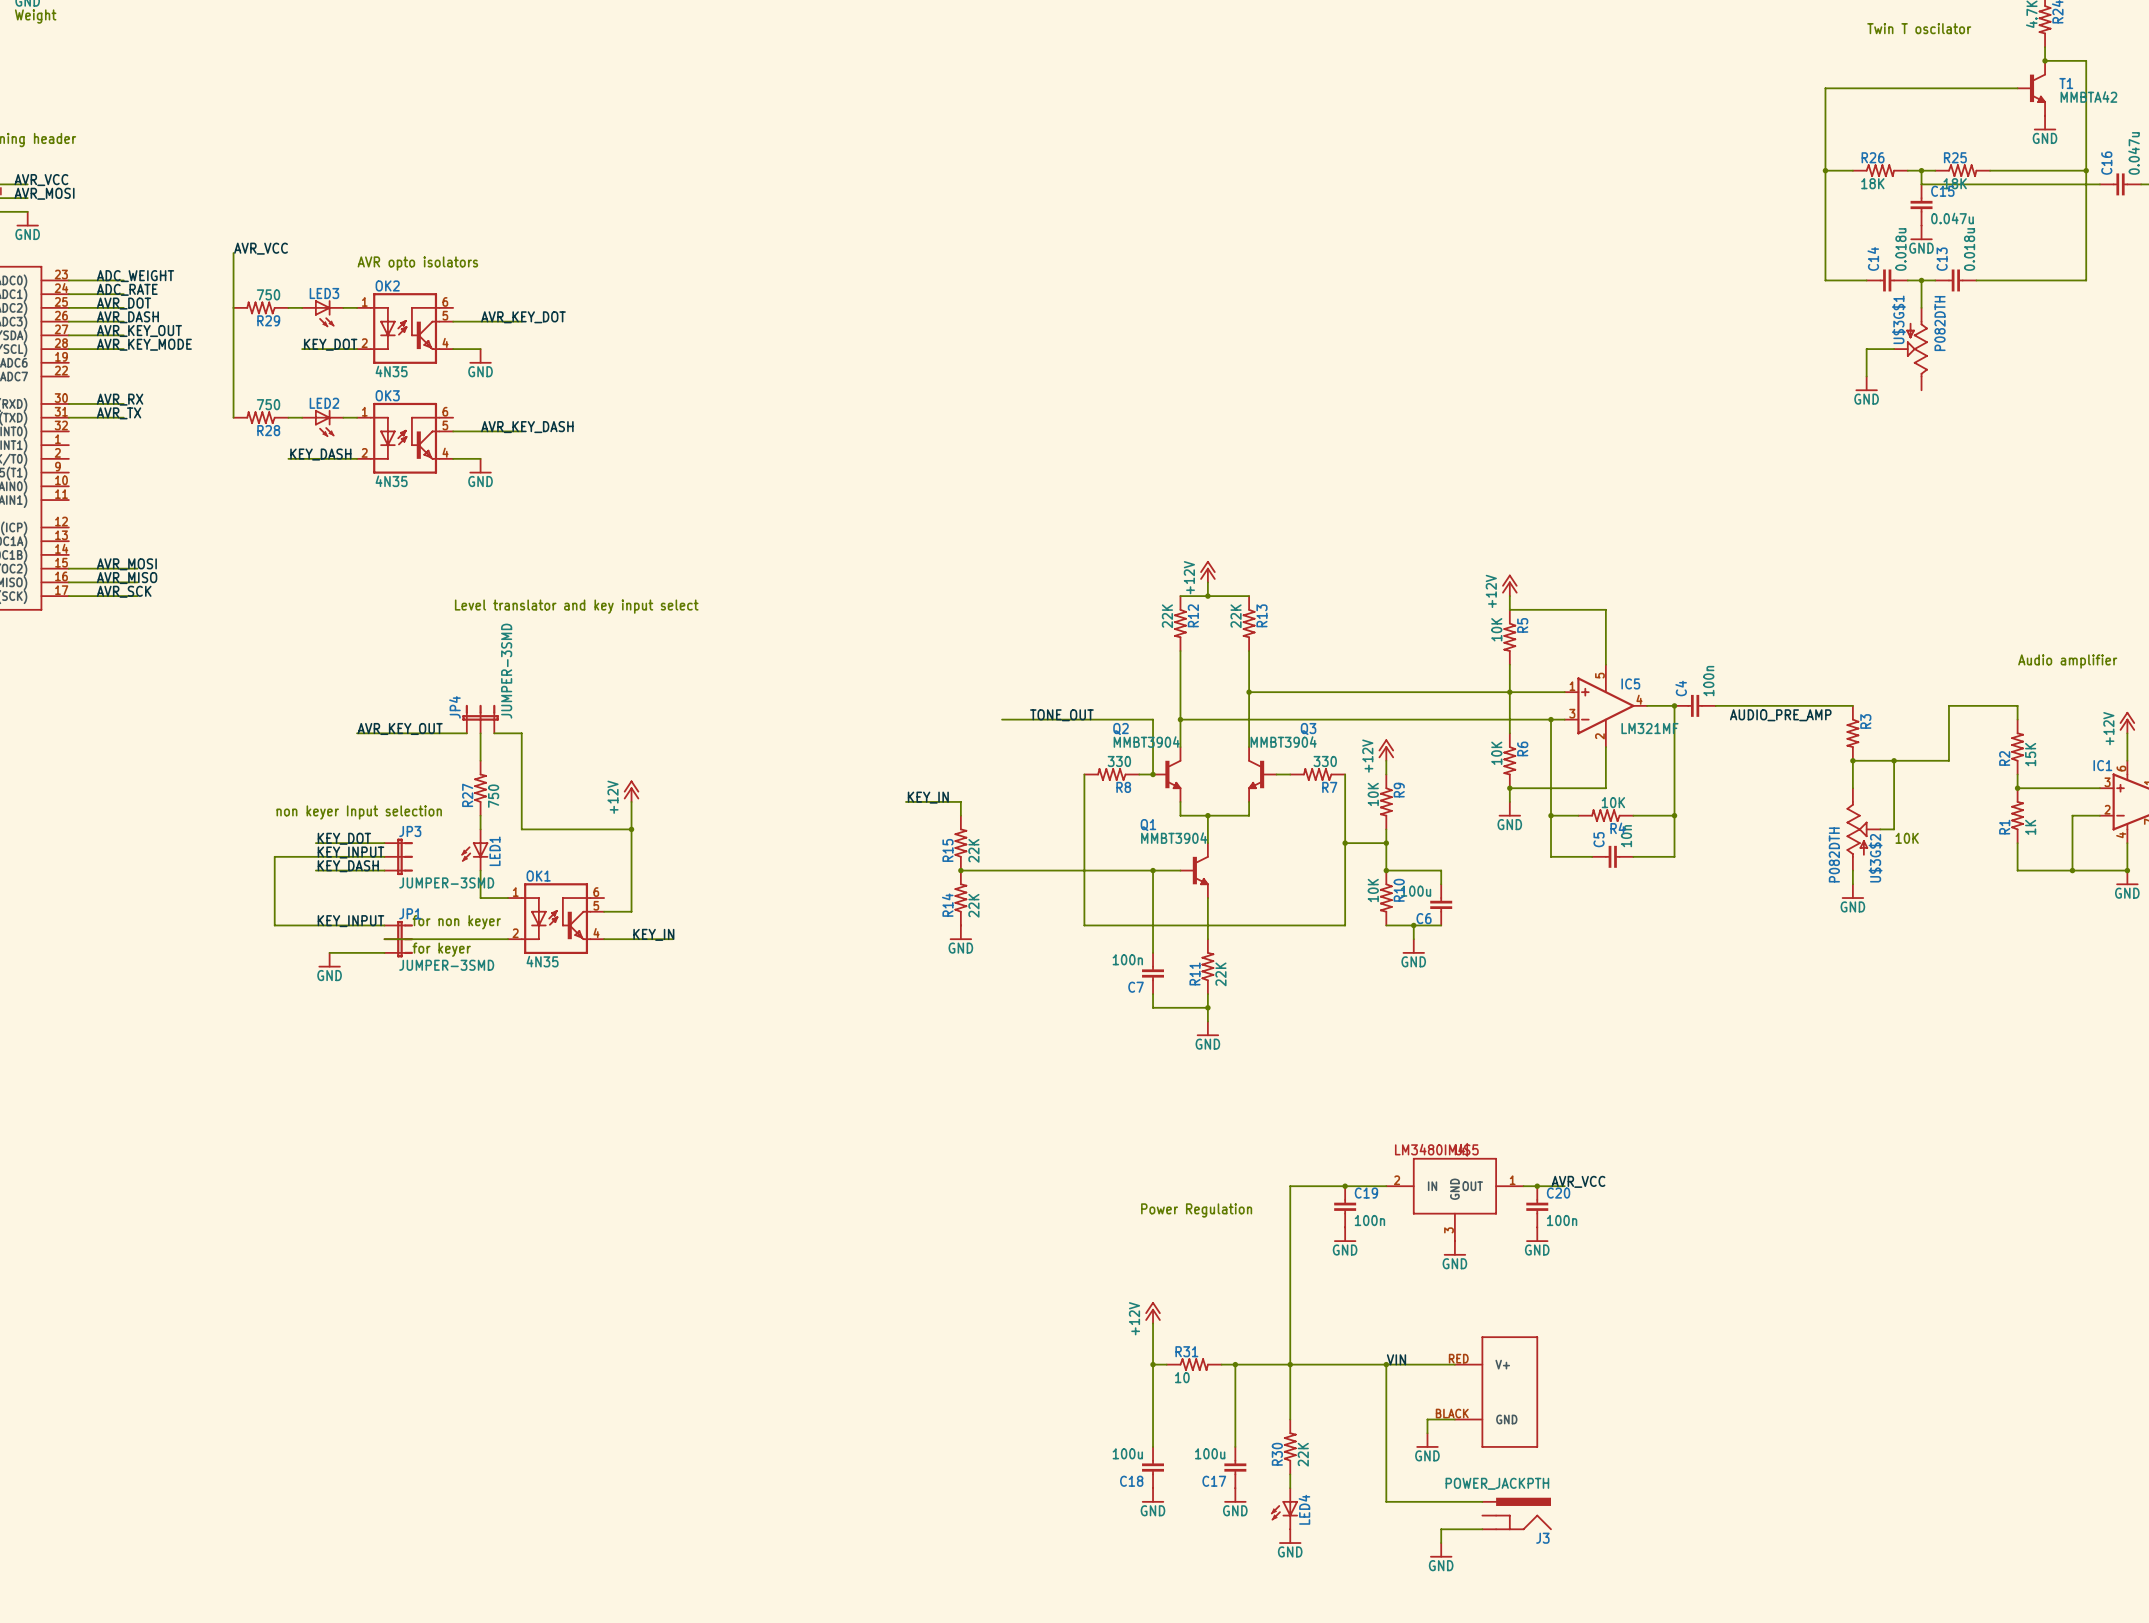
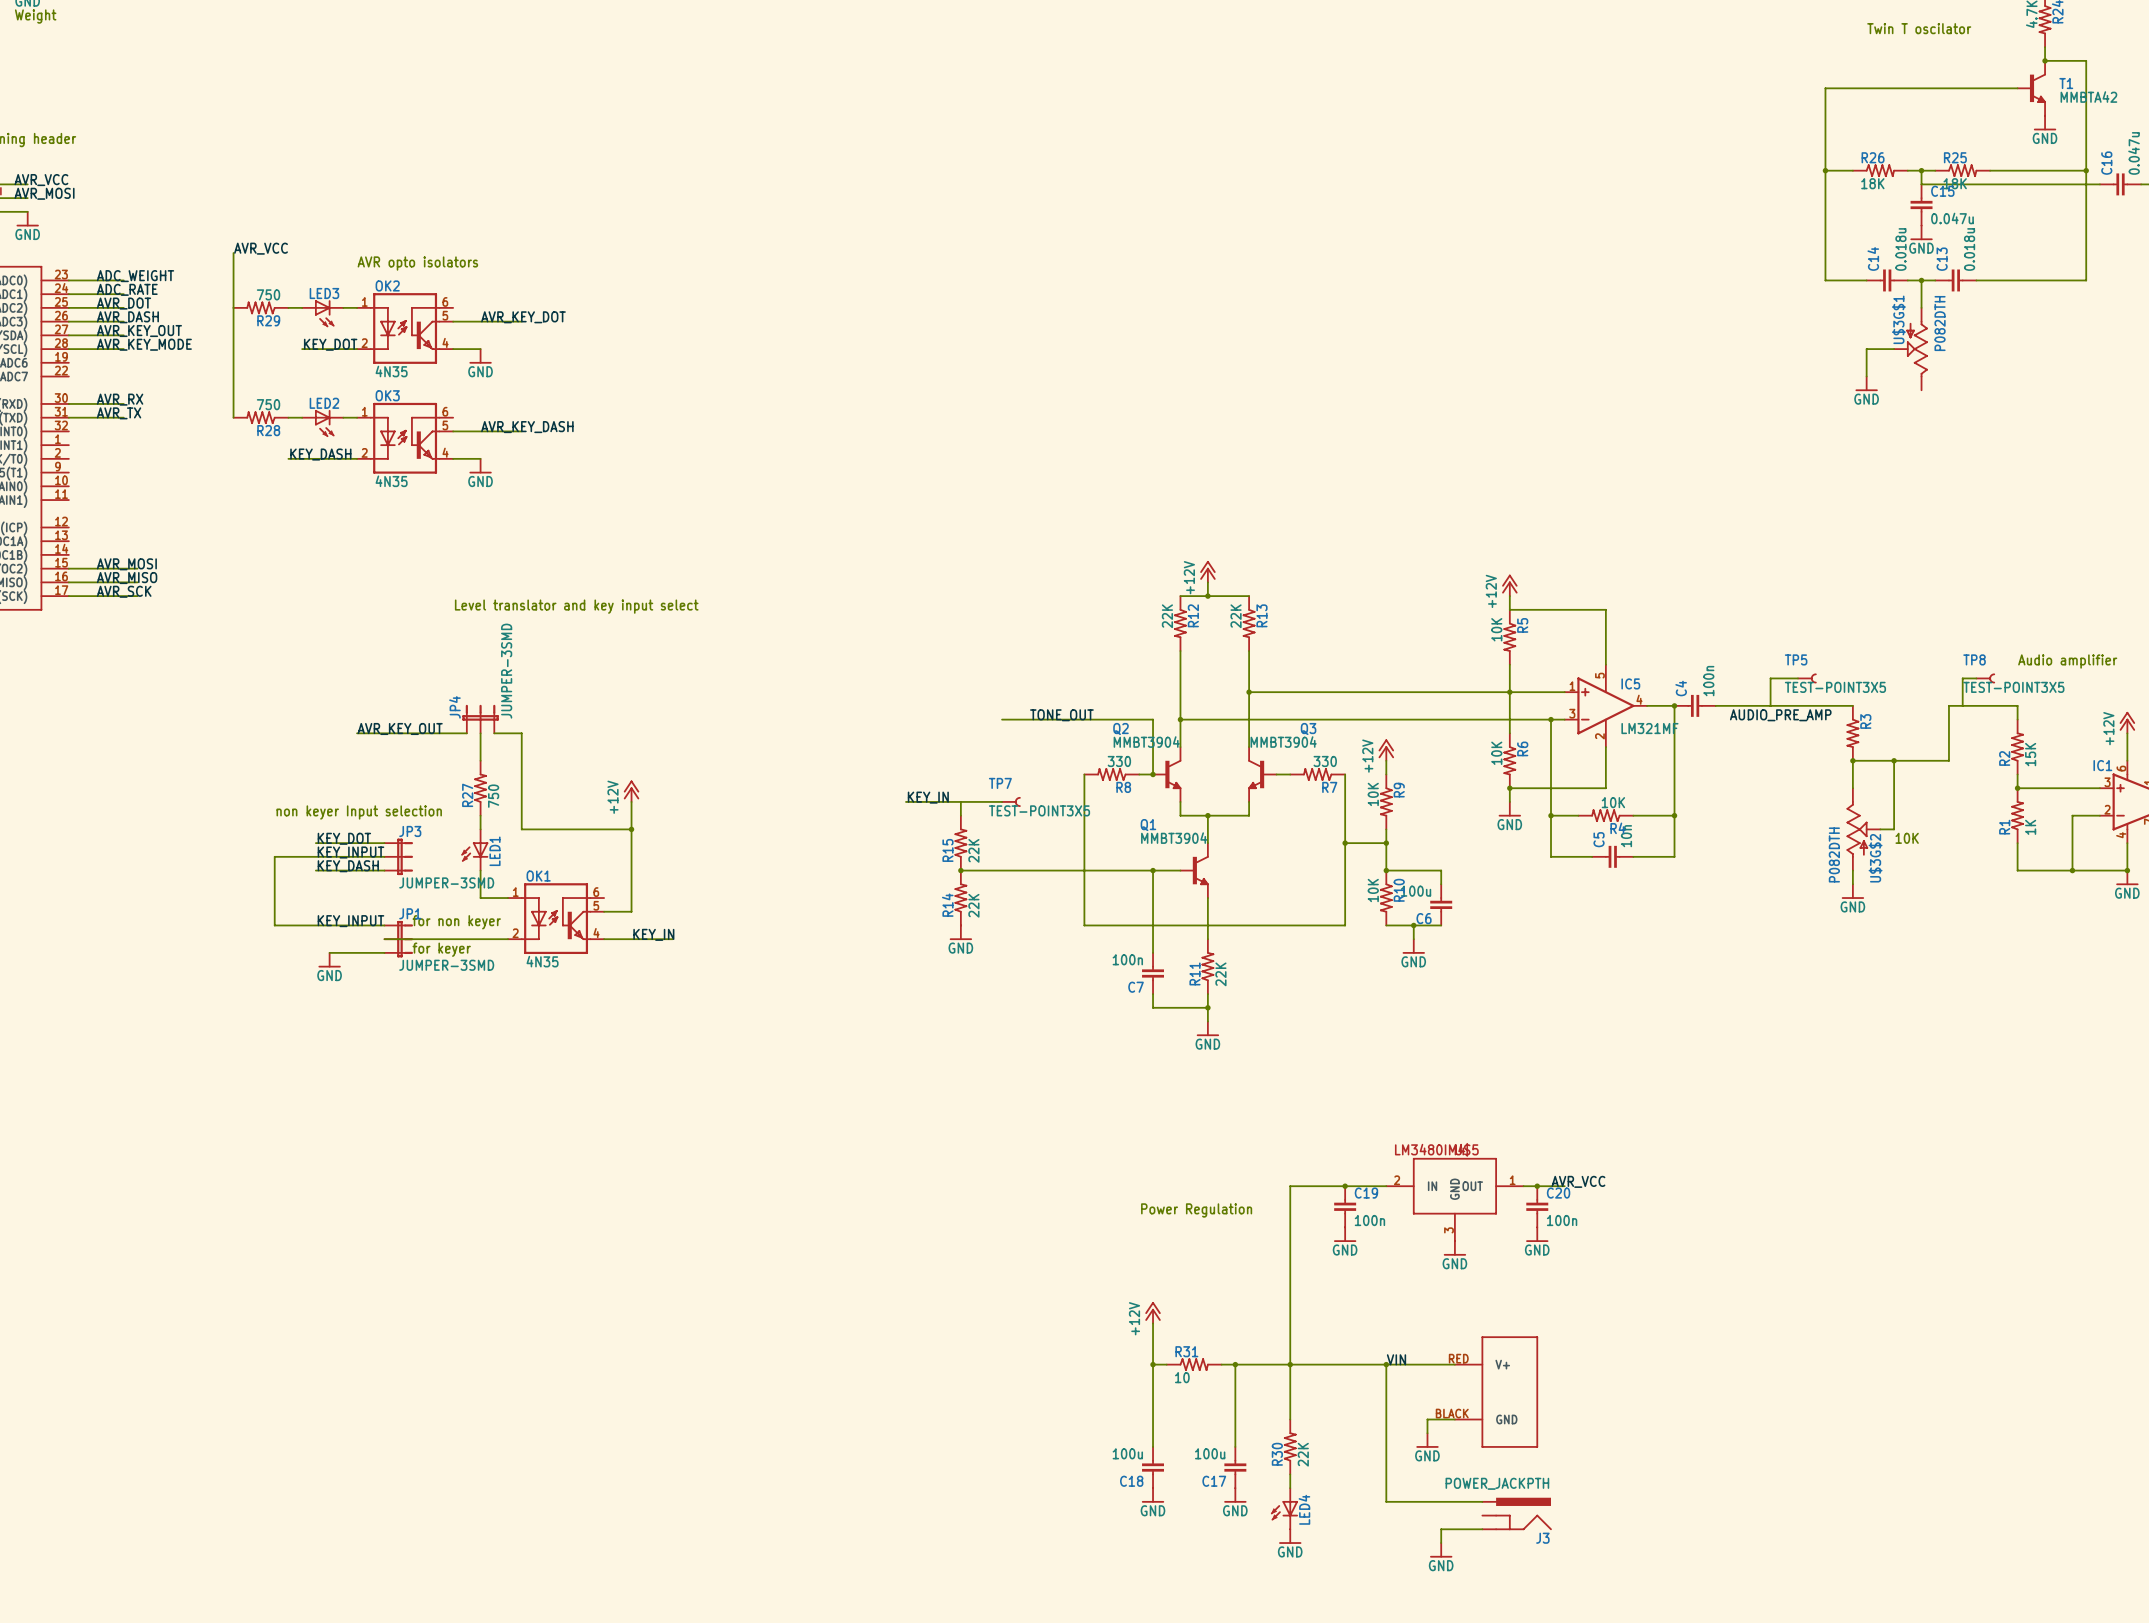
wire: none -> (1798, 678) (1770, 678) (1770, 705)
TP5: none -> TEST-POINT3X5 (1806, 678)
wire: none -> (1976, 678) (1962, 678) (1962, 705)
TP8: none -> TEST-POINT3X5 (1985, 678)
wire: none -> (960, 801) (1002, 801)
TP7: none -> TEST-POINT3X5 (1010, 801)

